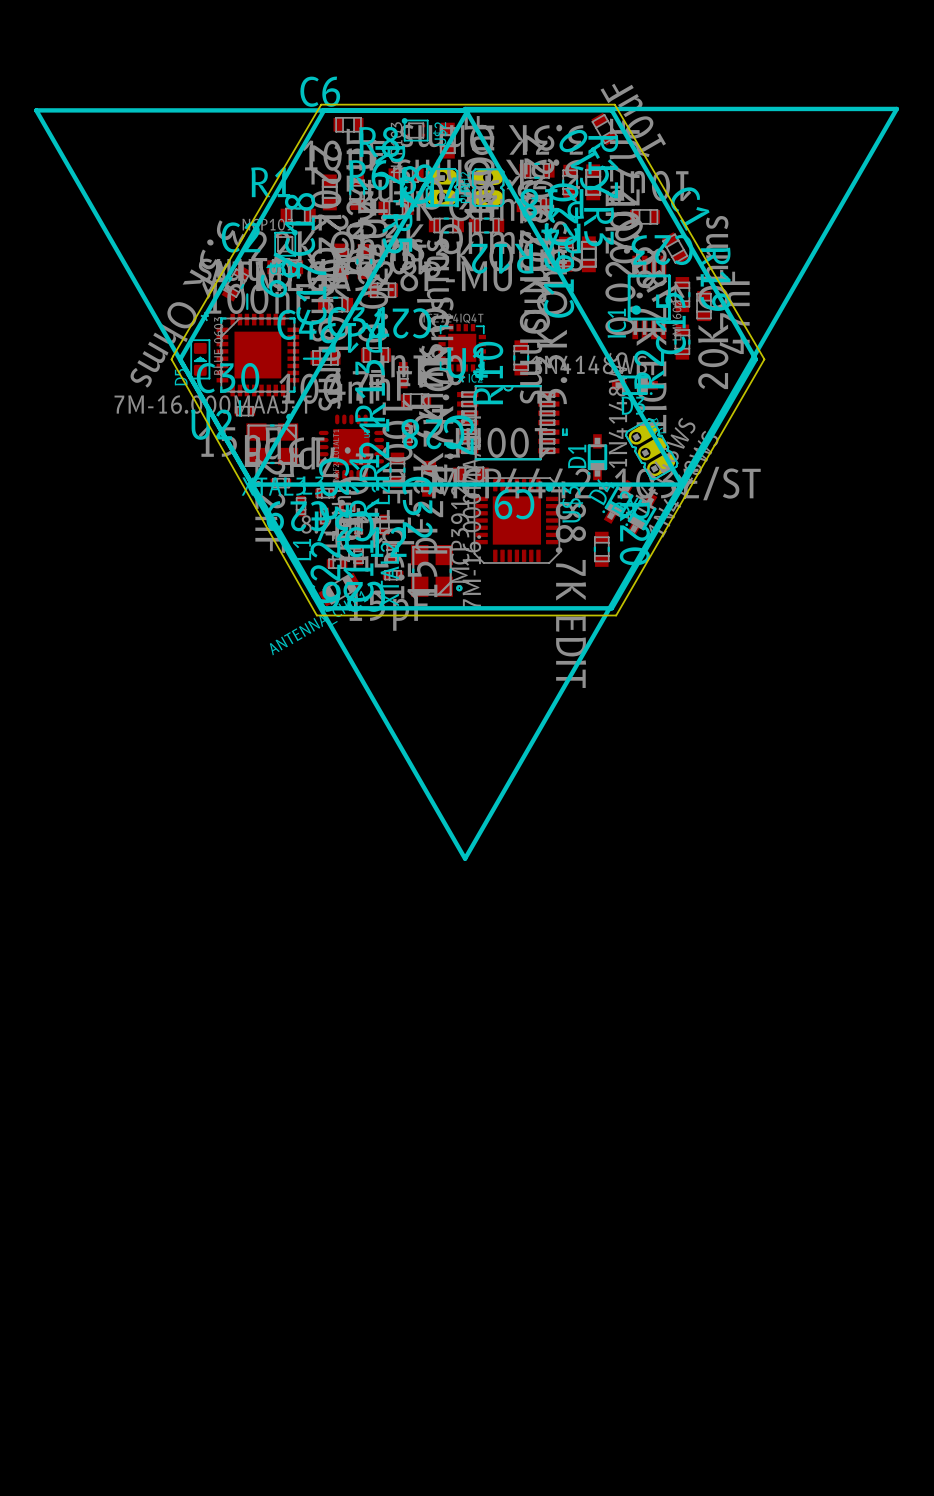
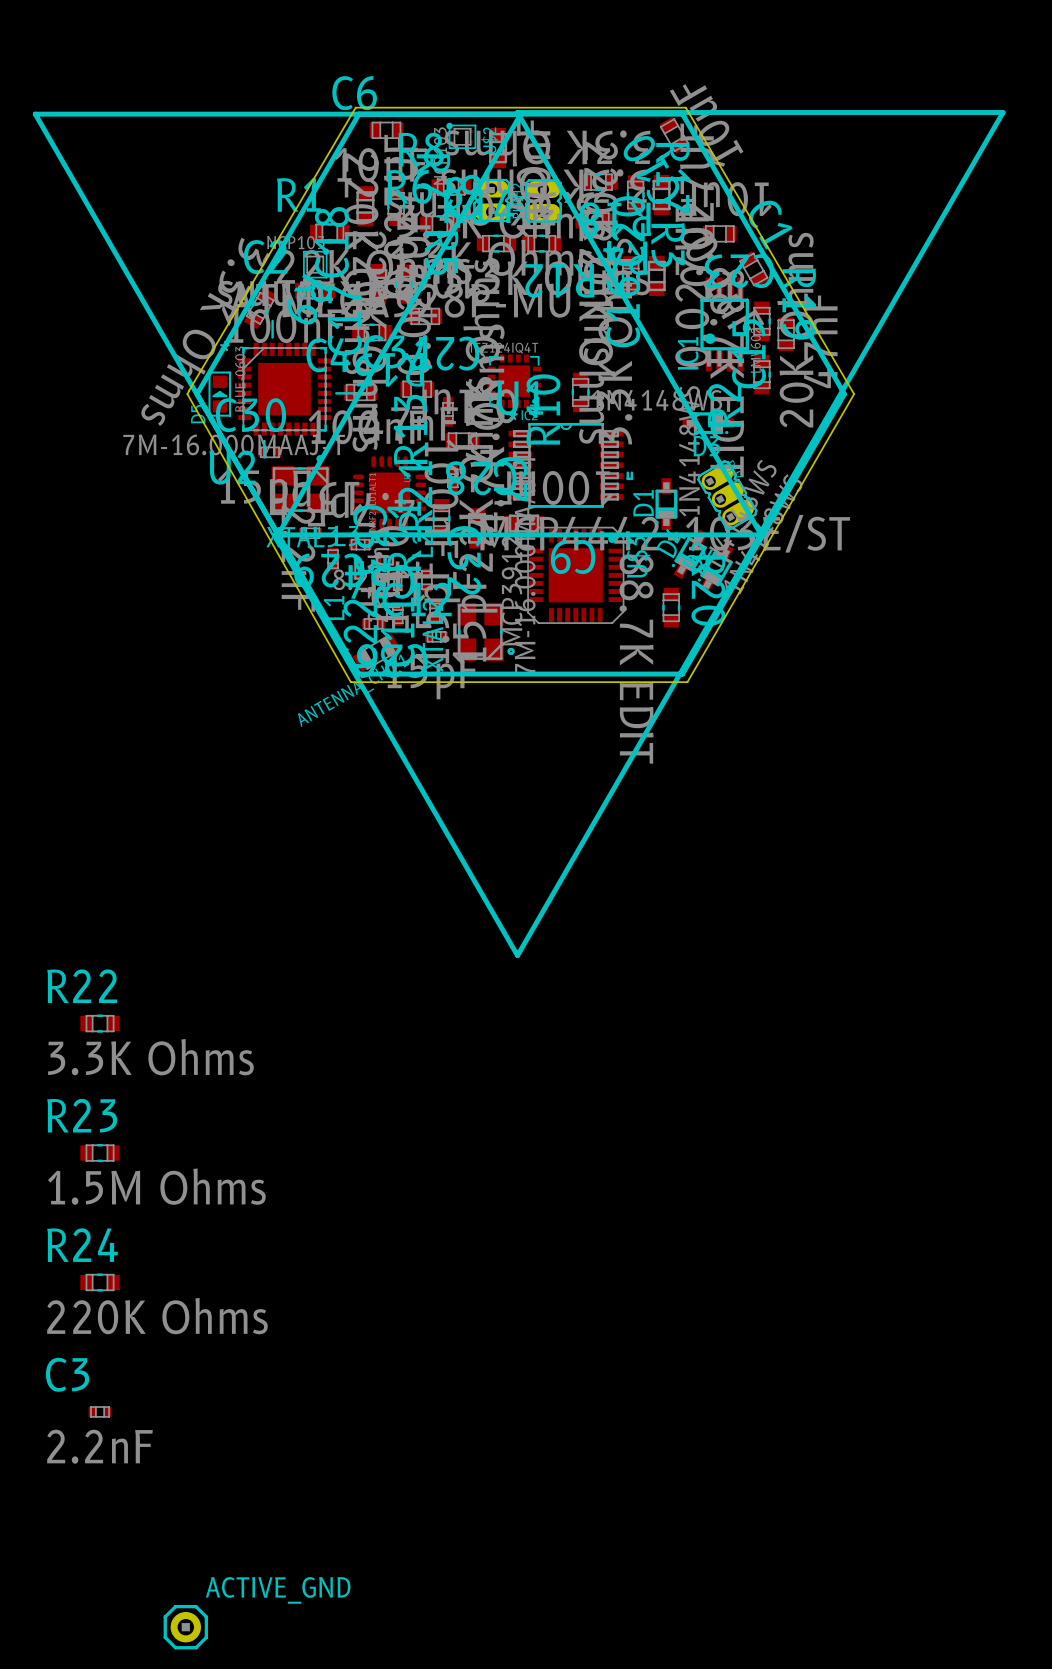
R22: none -> 3.3K Ohms (100, 1023)
R23: none -> 1.5M Ohms (100, 1153)
R24: none -> 220K Ohms (100, 1282)
C3: none -> 2.2nF (100, 1411)
ACTIVE_GND: none -> (185, 1627)

